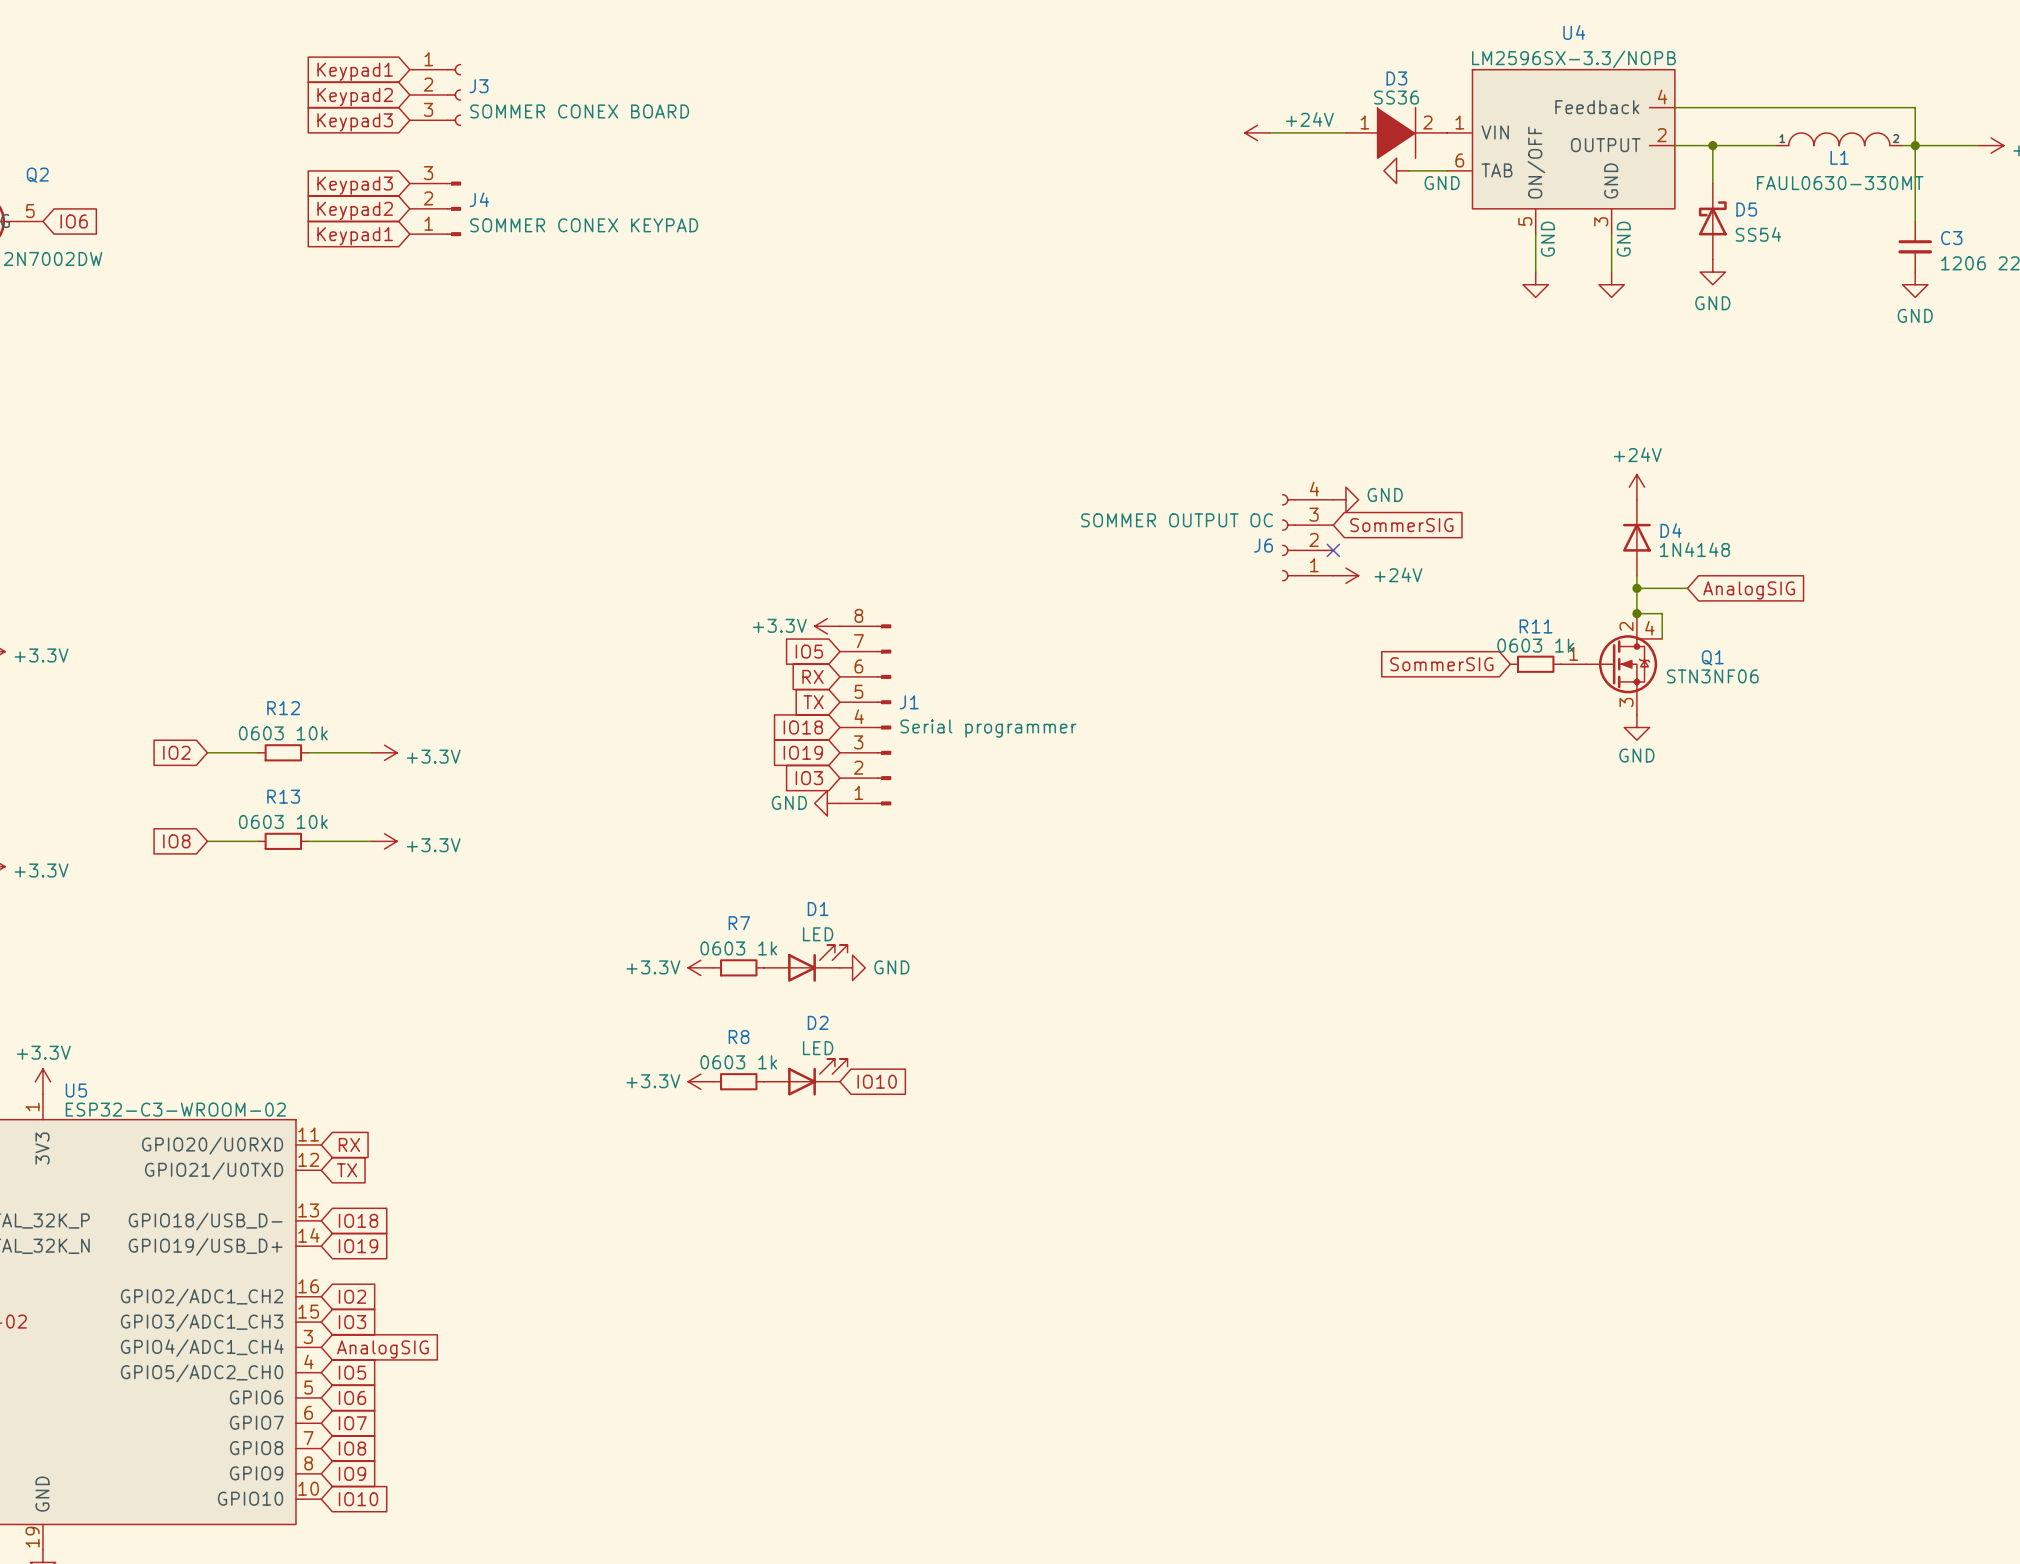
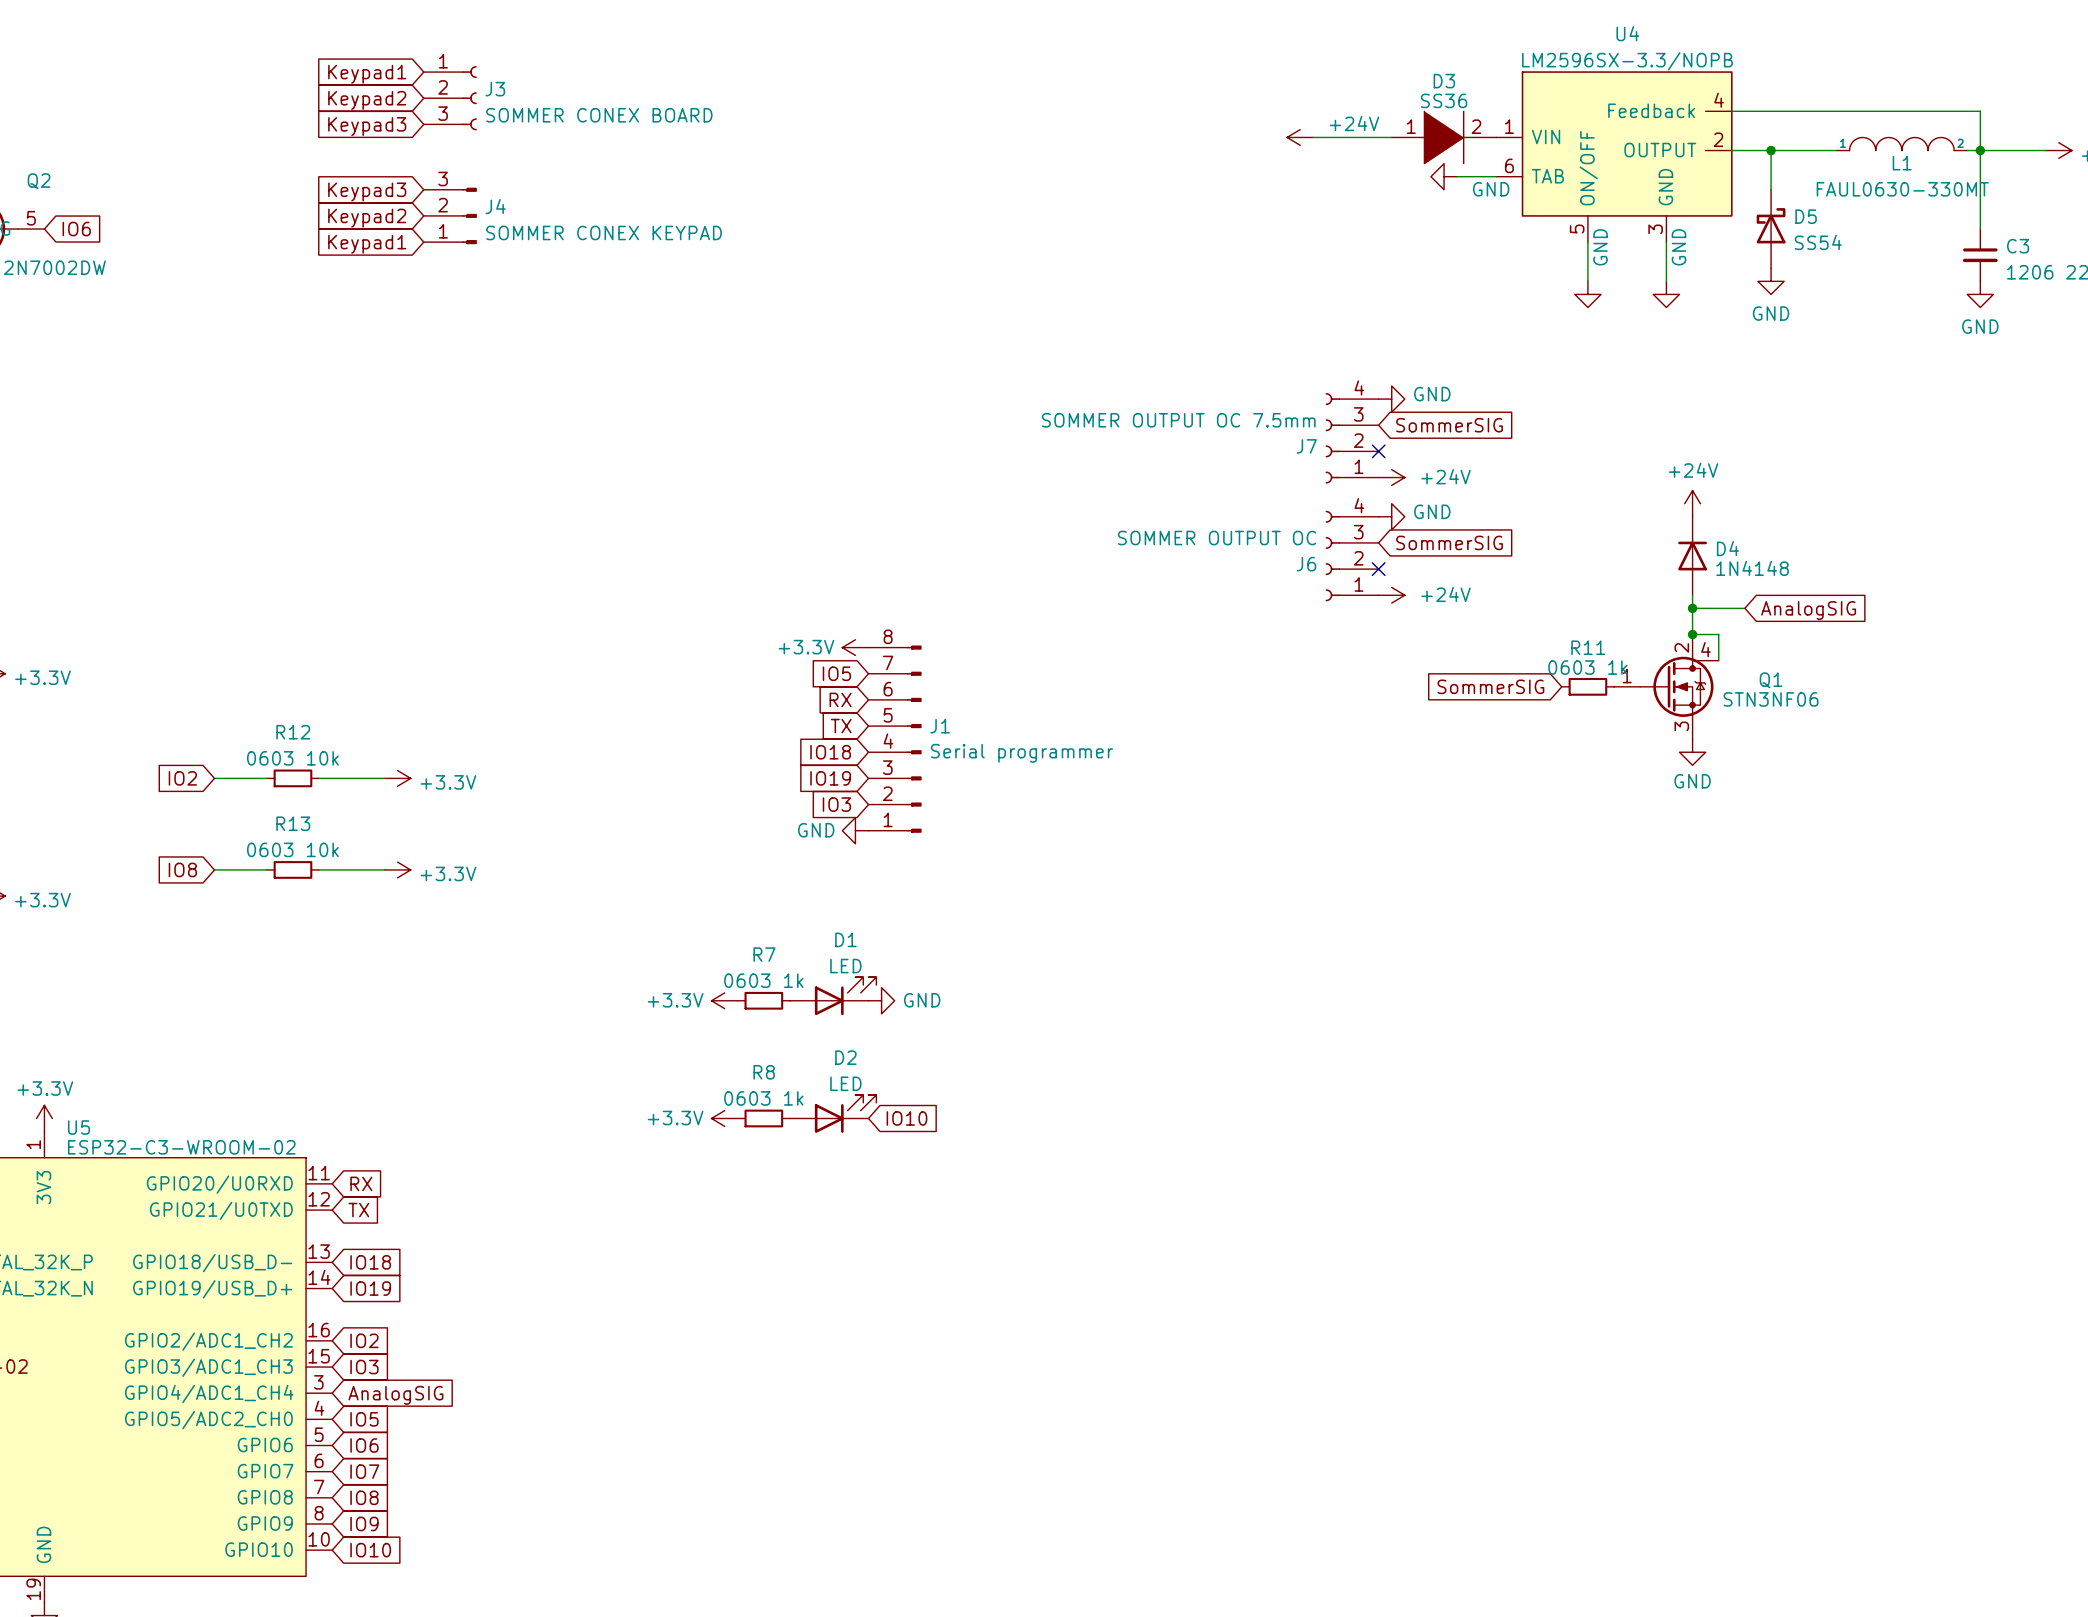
power symbol: none -> GND (1391, 399)
global label: none -> SommerSIG (1449, 425)
J7: none -> SOMMER OUTPUT OC 7.5mm (1352, 438)
no-connect mark: none -> (1378, 451)
power symbol: none -> +24V (1391, 477)

